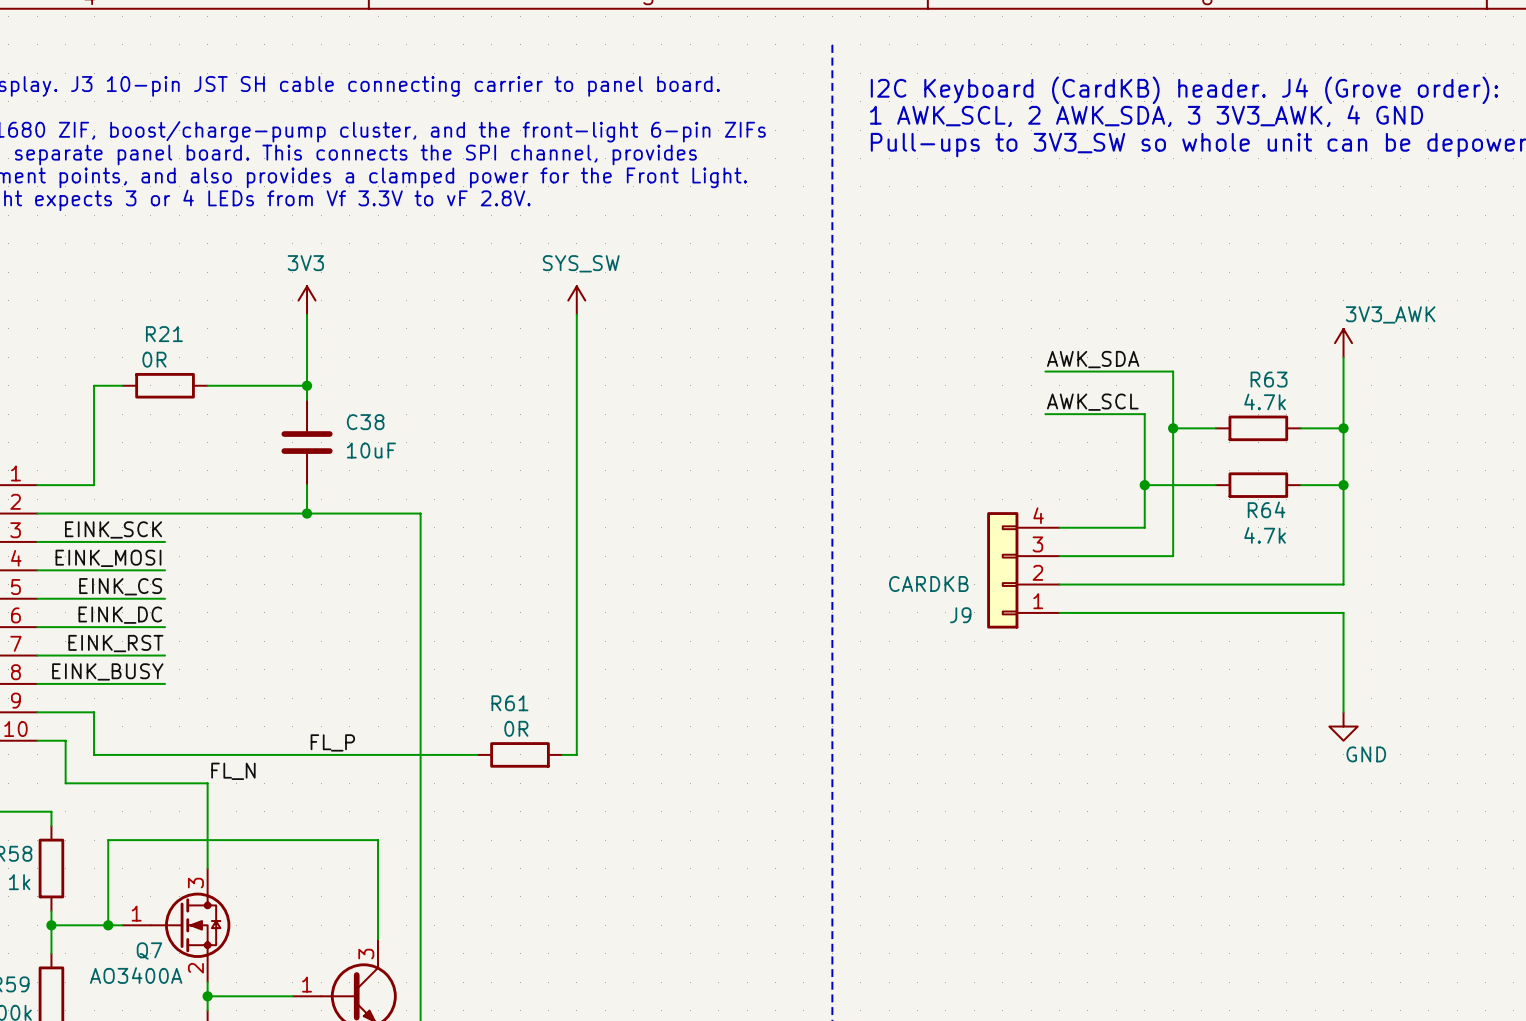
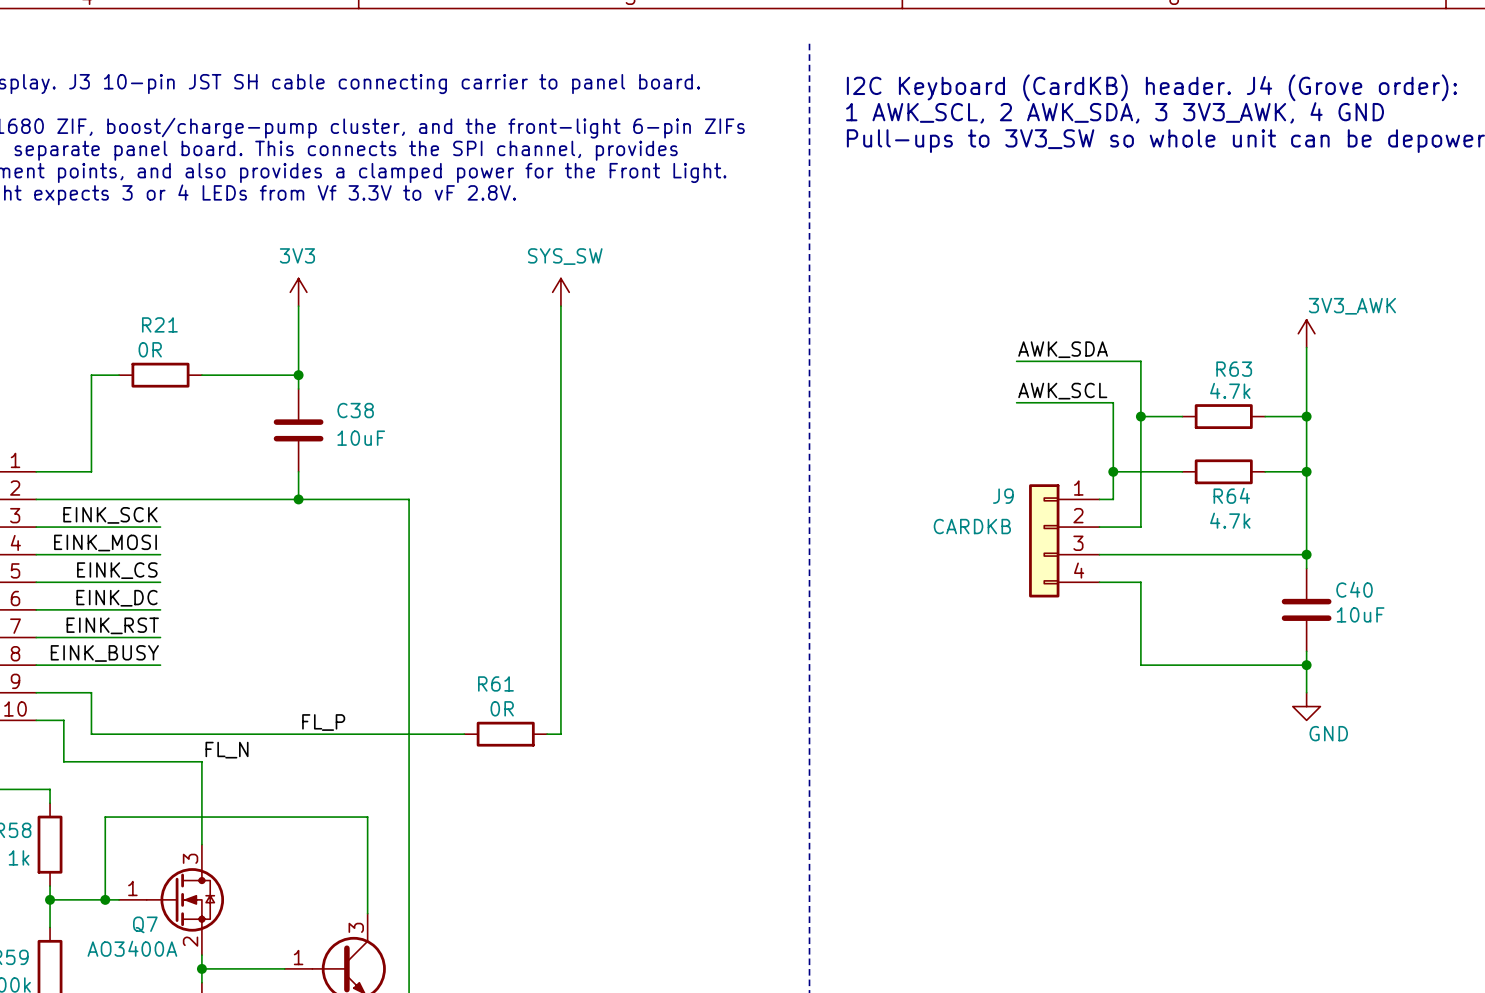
wire: (1144, 513) (1144, 527) (1059, 527) -> (1113, 499) (1099, 499)
wire: (1173, 541) (1173, 556) (1059, 556) -> (1140, 527) (1099, 527)
J9 flip: as is (1002, 570) -> up-down (1044, 540)
J9 position: (1023, 570) -> (1064, 540)
wire: none -> (1099, 554) (1306, 554)
junction: none -> (1306, 554)
wire: (1059, 584) (1343, 584) -> none
wire: none -> (1099, 582) (1140, 582) (1140, 665) (1306, 665)
wire: (1059, 612) (1343, 612) (1343, 669) -> none
C40: none -> 10uF (1306, 609)
junction: none -> (1306, 665)

